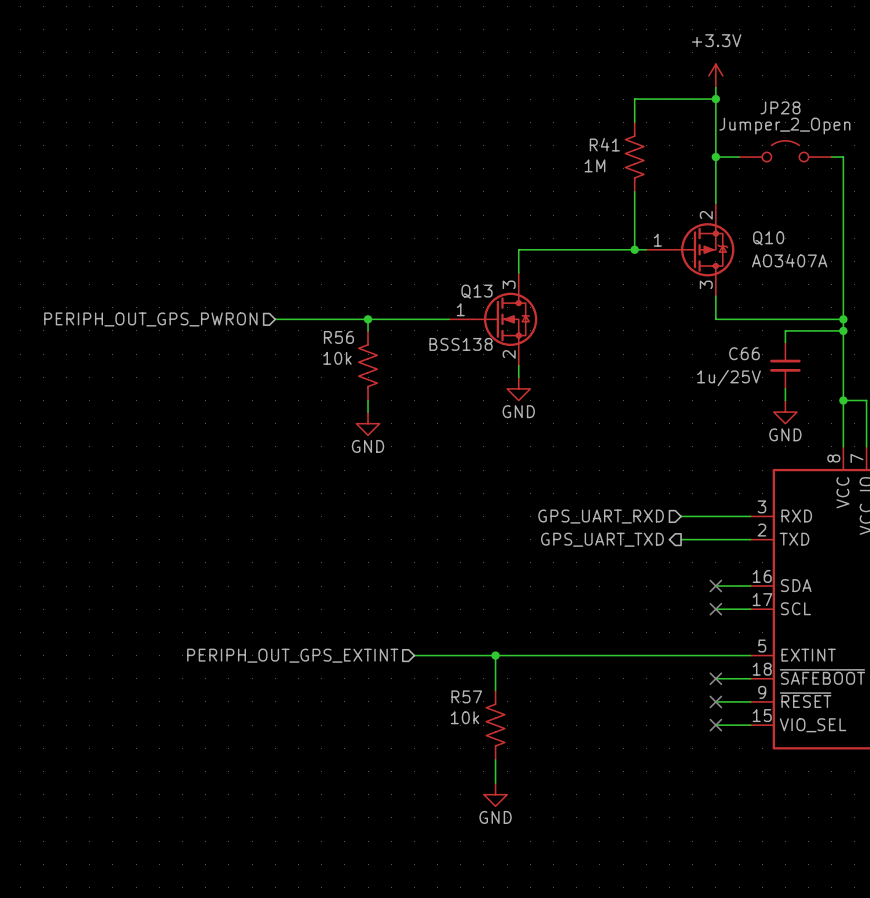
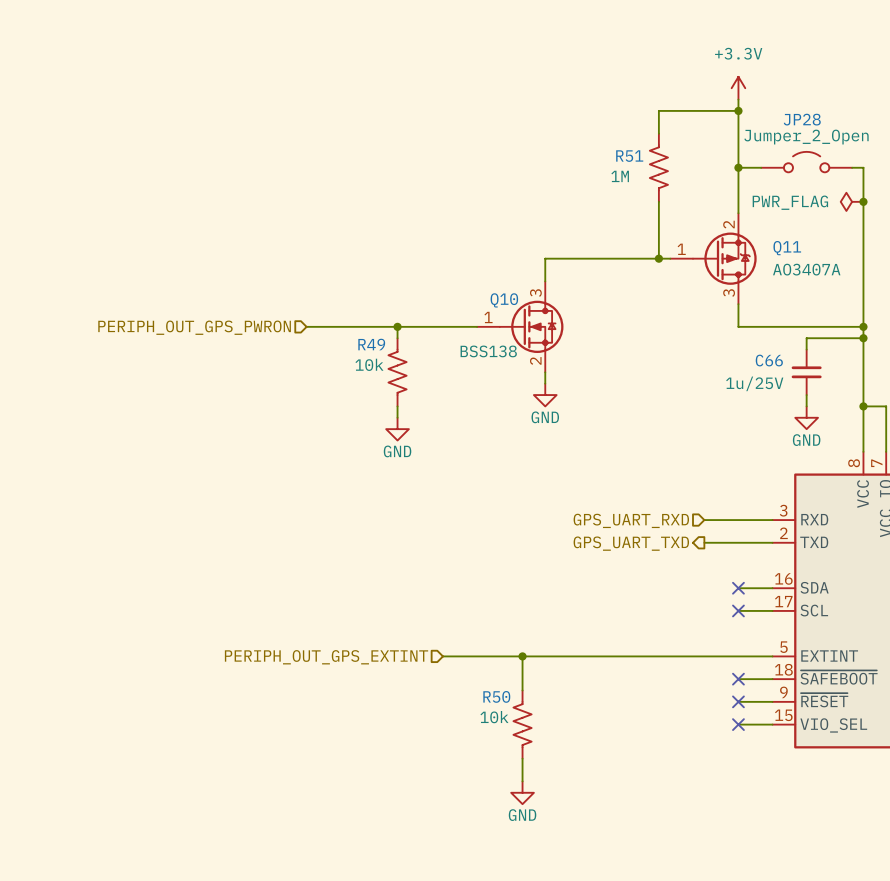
R41 name: R41 (604, 144) -> R51 (629, 156)
power symbol: none -> PWR_FLAG (852, 201)
junction: none -> (863, 201)
Q10 name: Q10 (768, 238) -> Q11 (787, 248)
Q13 name: Q13 (477, 291) -> Q10 (504, 300)
R56 name: R56 (338, 337) -> R49 (371, 344)
R57 name: R57 (466, 696) -> R50 (496, 696)

